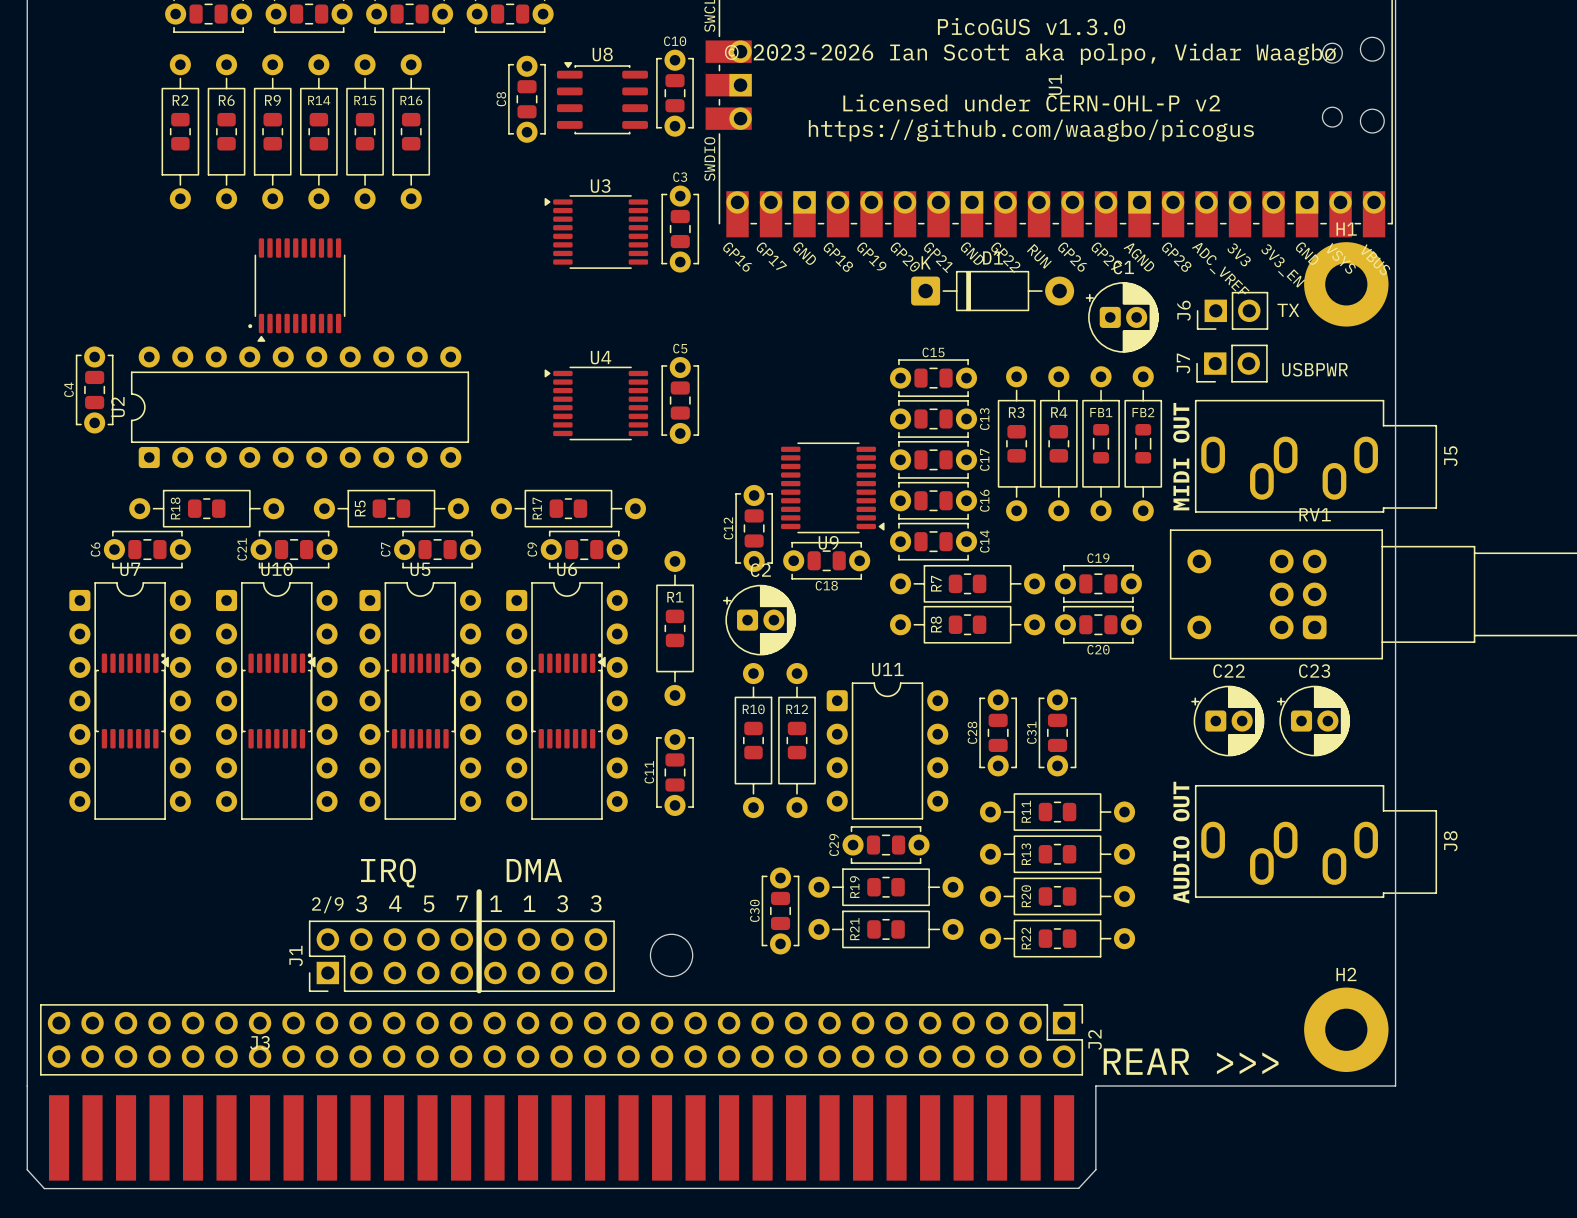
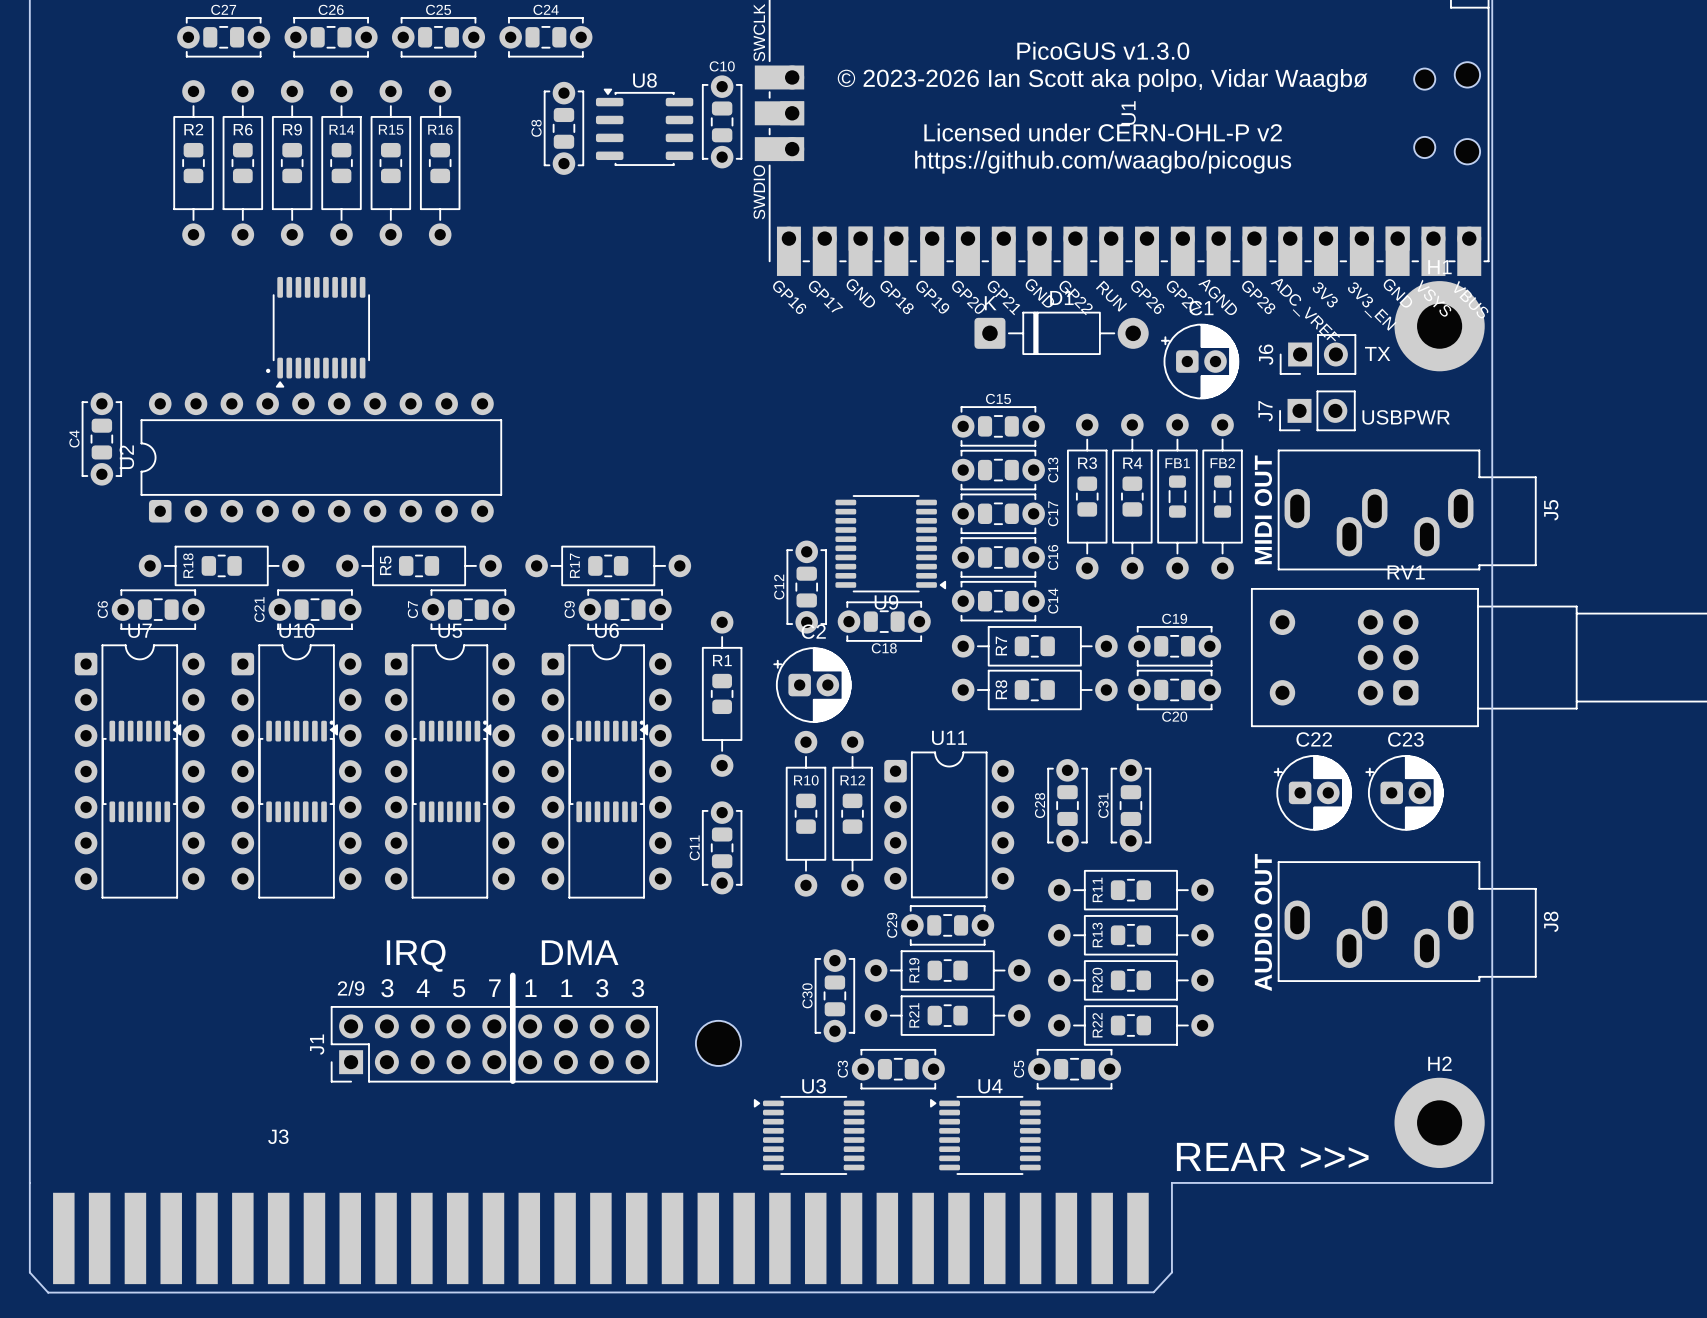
C3 name position: C3 (680, 177) -> C3 (842, 1069)
C3 rotation: 0° (680, 229) -> 90° clockwise (898, 1069)
C3 position: (680, 229) -> (898, 1069)
U3 position: (596, 232) -> (809, 1135)
C5 name position: C5 (680, 348) -> C5 (1019, 1069)
C5 rotation: 0° (680, 400) -> 90° clockwise (1074, 1069)
C5 position: (680, 400) -> (1074, 1069)
U4 position: (596, 403) -> (985, 1135)
J2: (561, 1039) -> none

